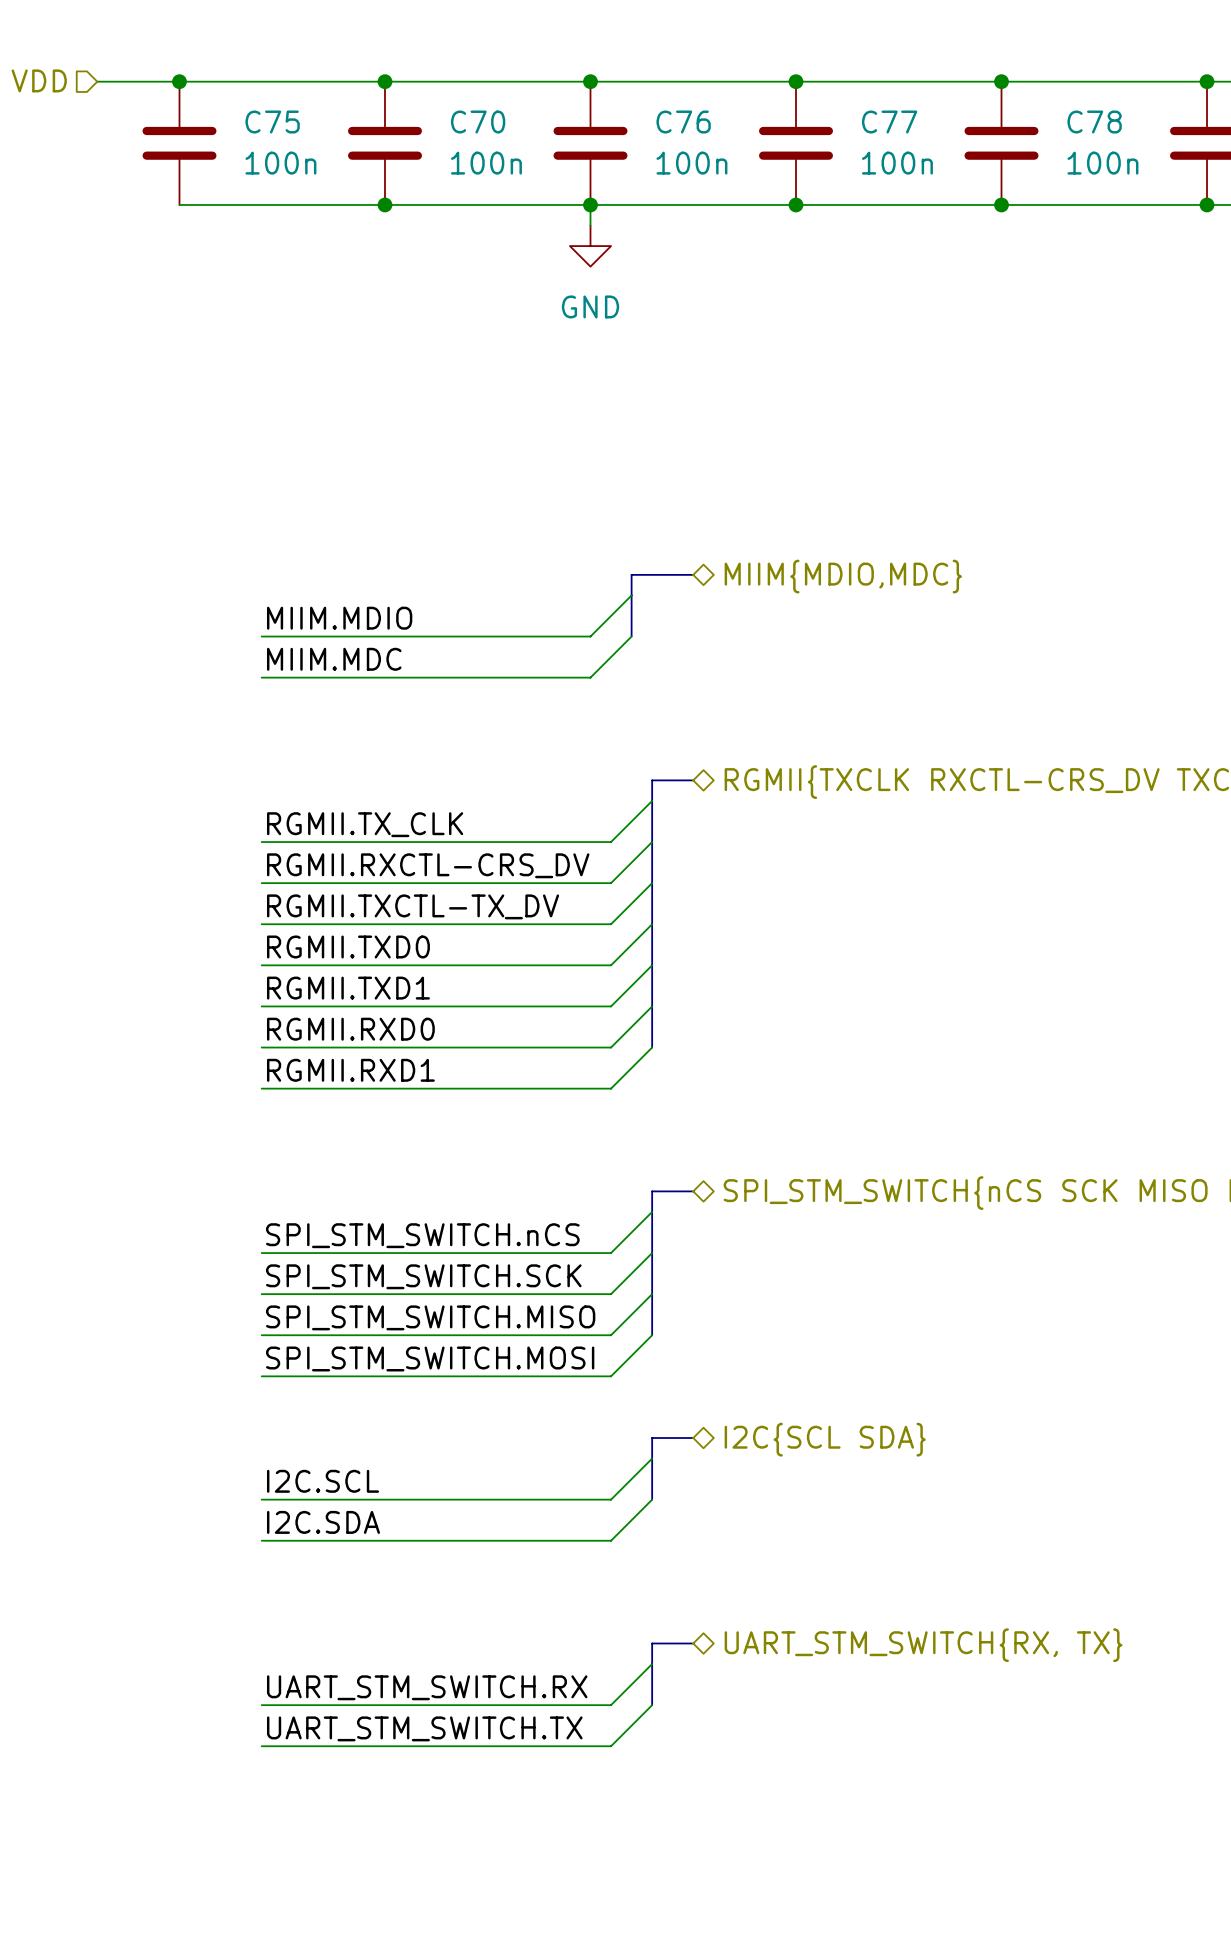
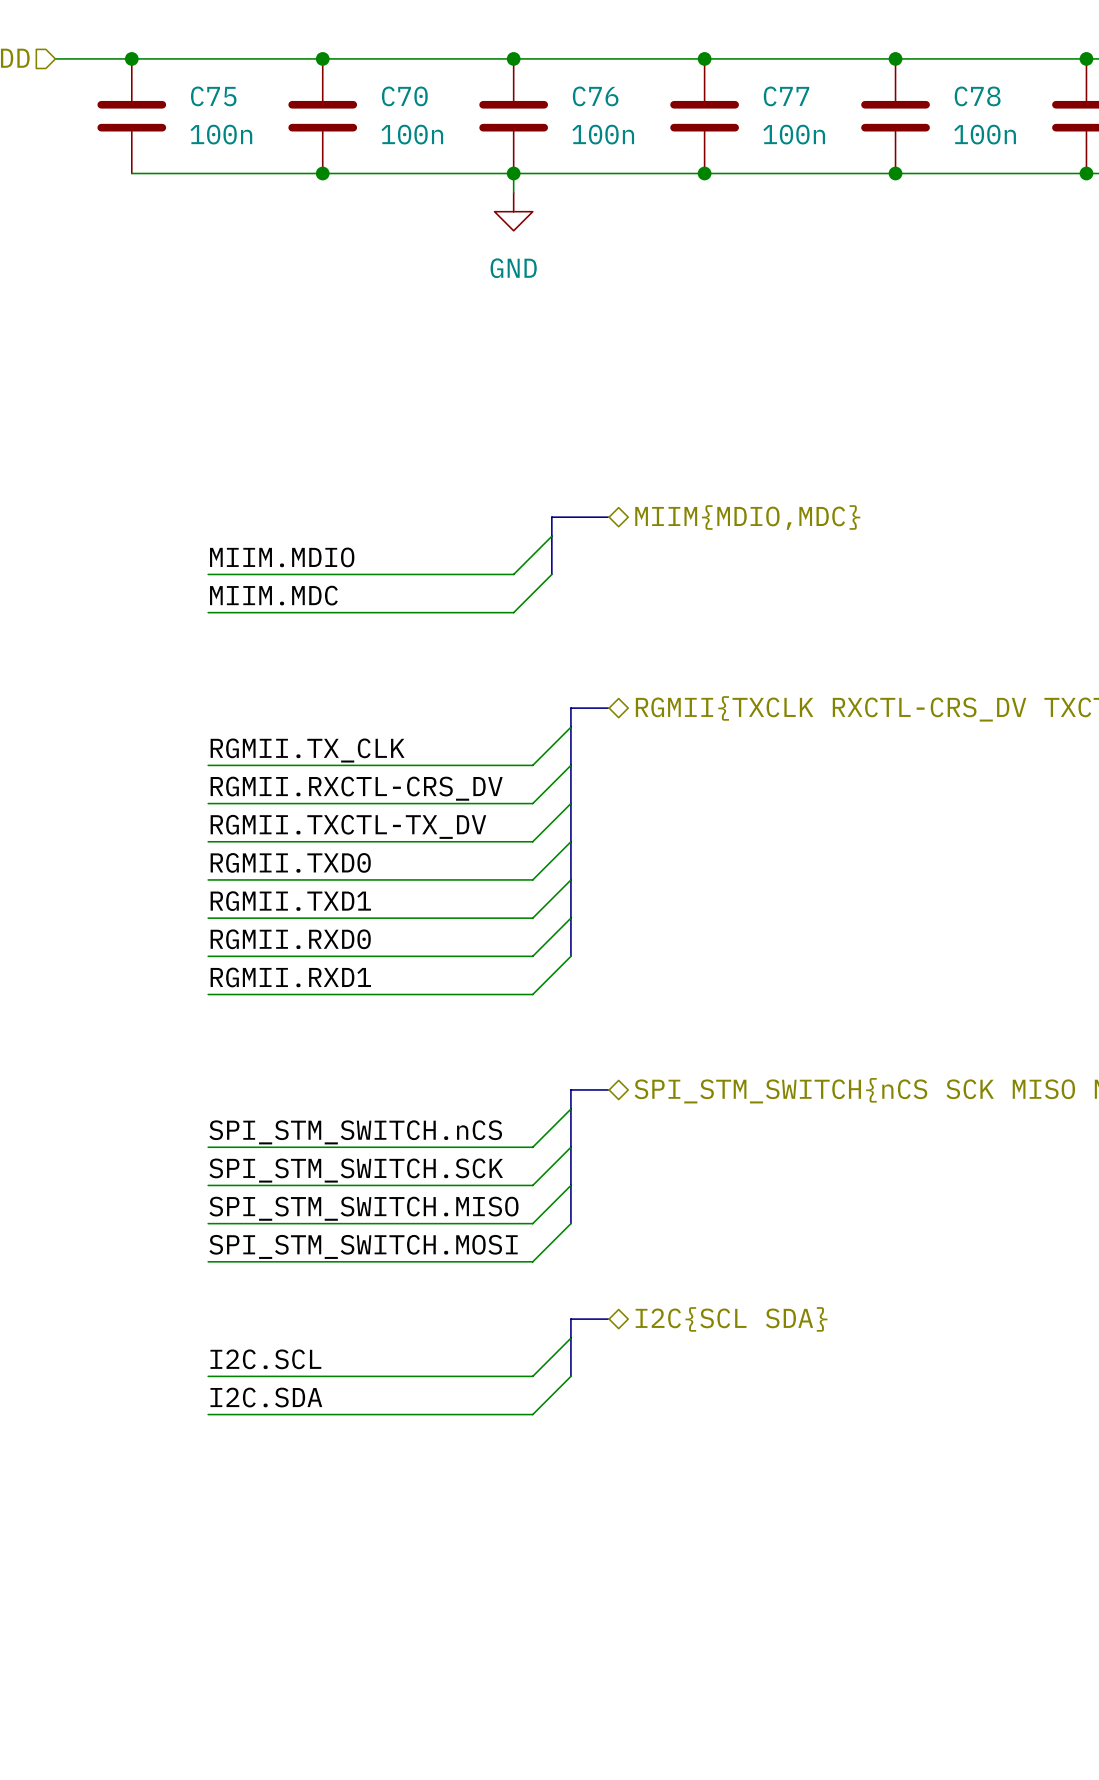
bus: (693, 1643) (652, 1643) (652, 1705) -> none
hierarchical label: UART_STM_SWITCH{RX, TX} (923, 1645) -> none
wire: (652, 1664) (611, 1705) (261, 1705) -> none
label: UART_STM_SWITCH.RX (427, 1687) -> none
wire: (652, 1705) (611, 1746) (261, 1746) -> none
label: UART_STM_SWITCH.TX (424, 1728) -> none

